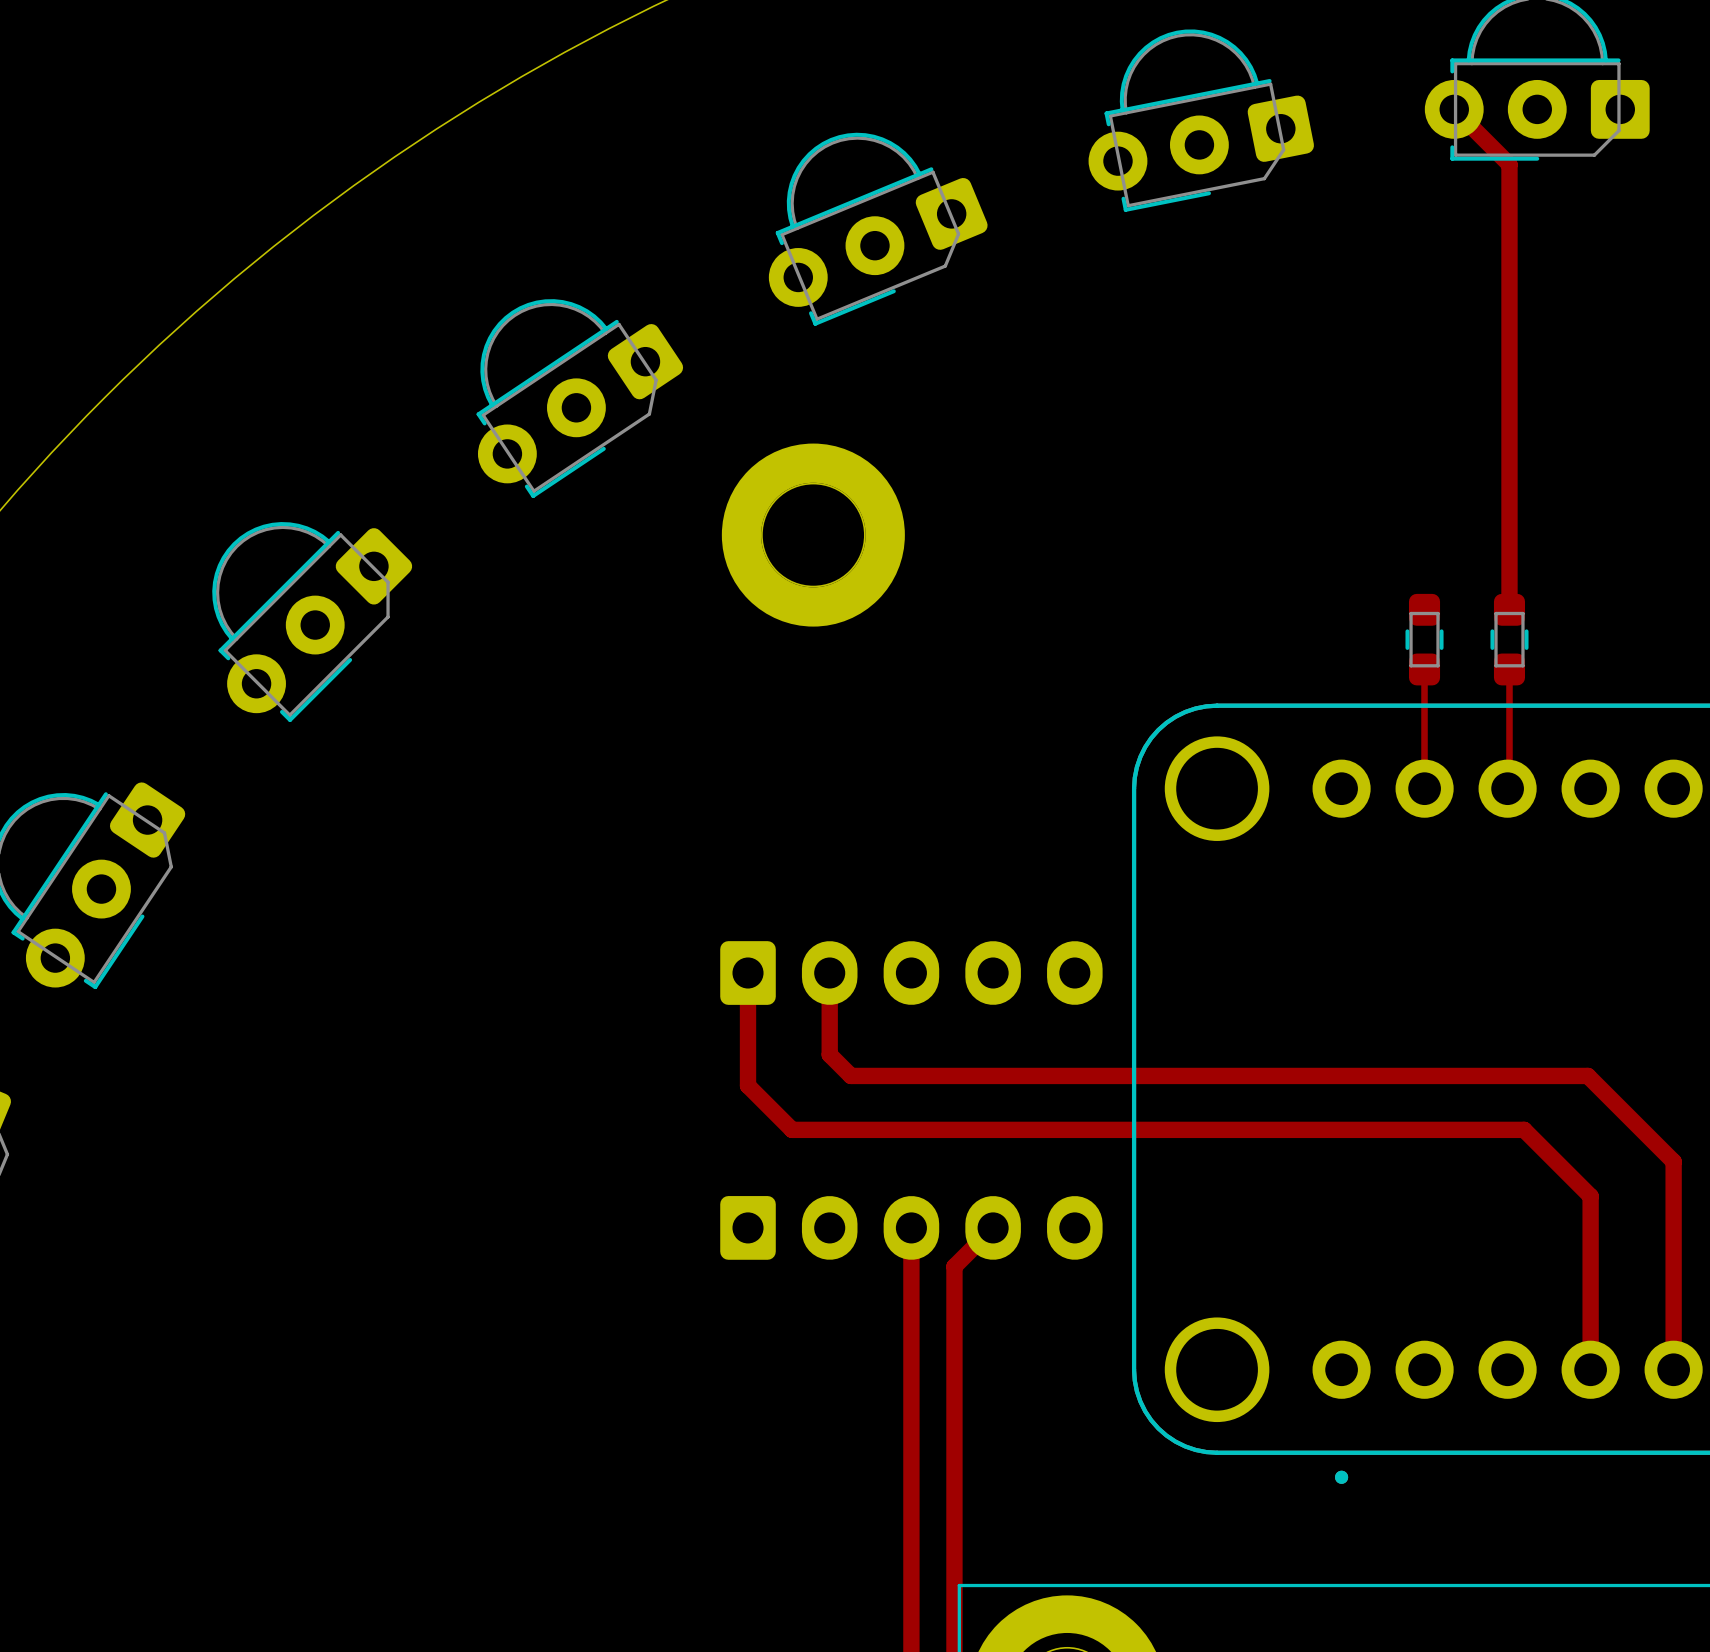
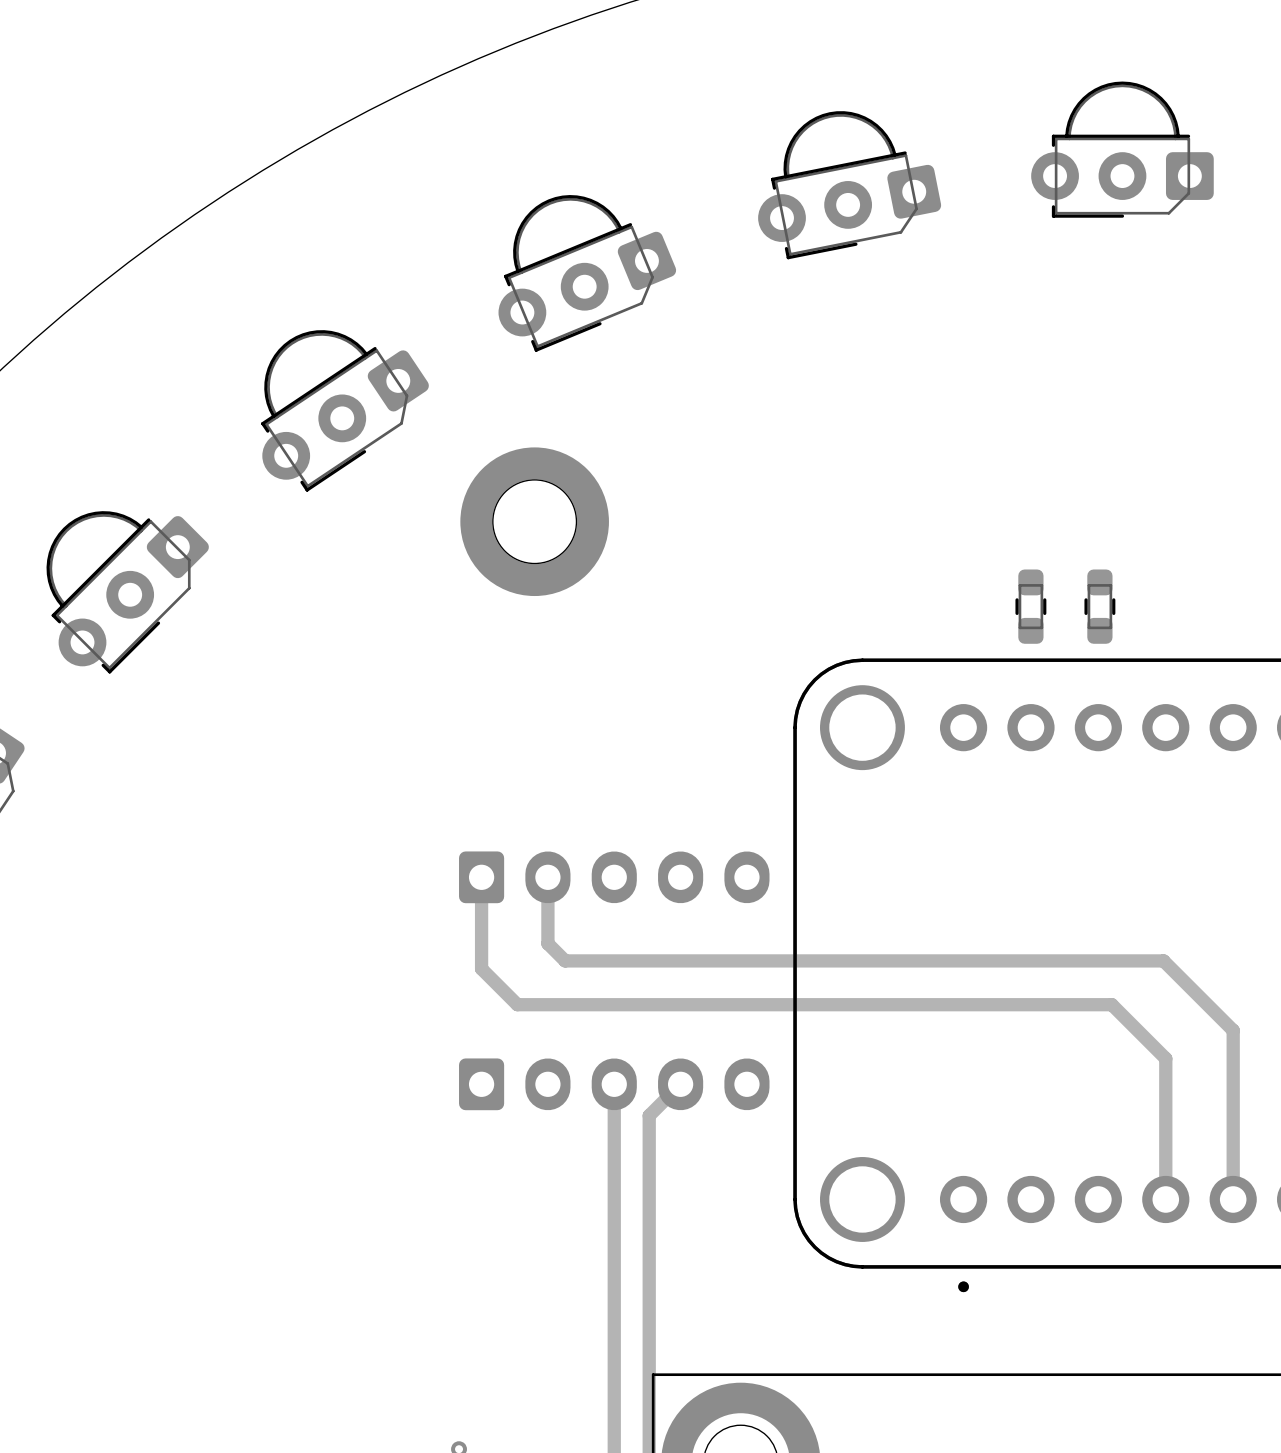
track: (1454, 109) (1509, 164) (1509, 609) -> none
track: (1424, 669) (1424, 788) -> none
track: (1509, 669) (1509, 786) (1507, 788) -> none

